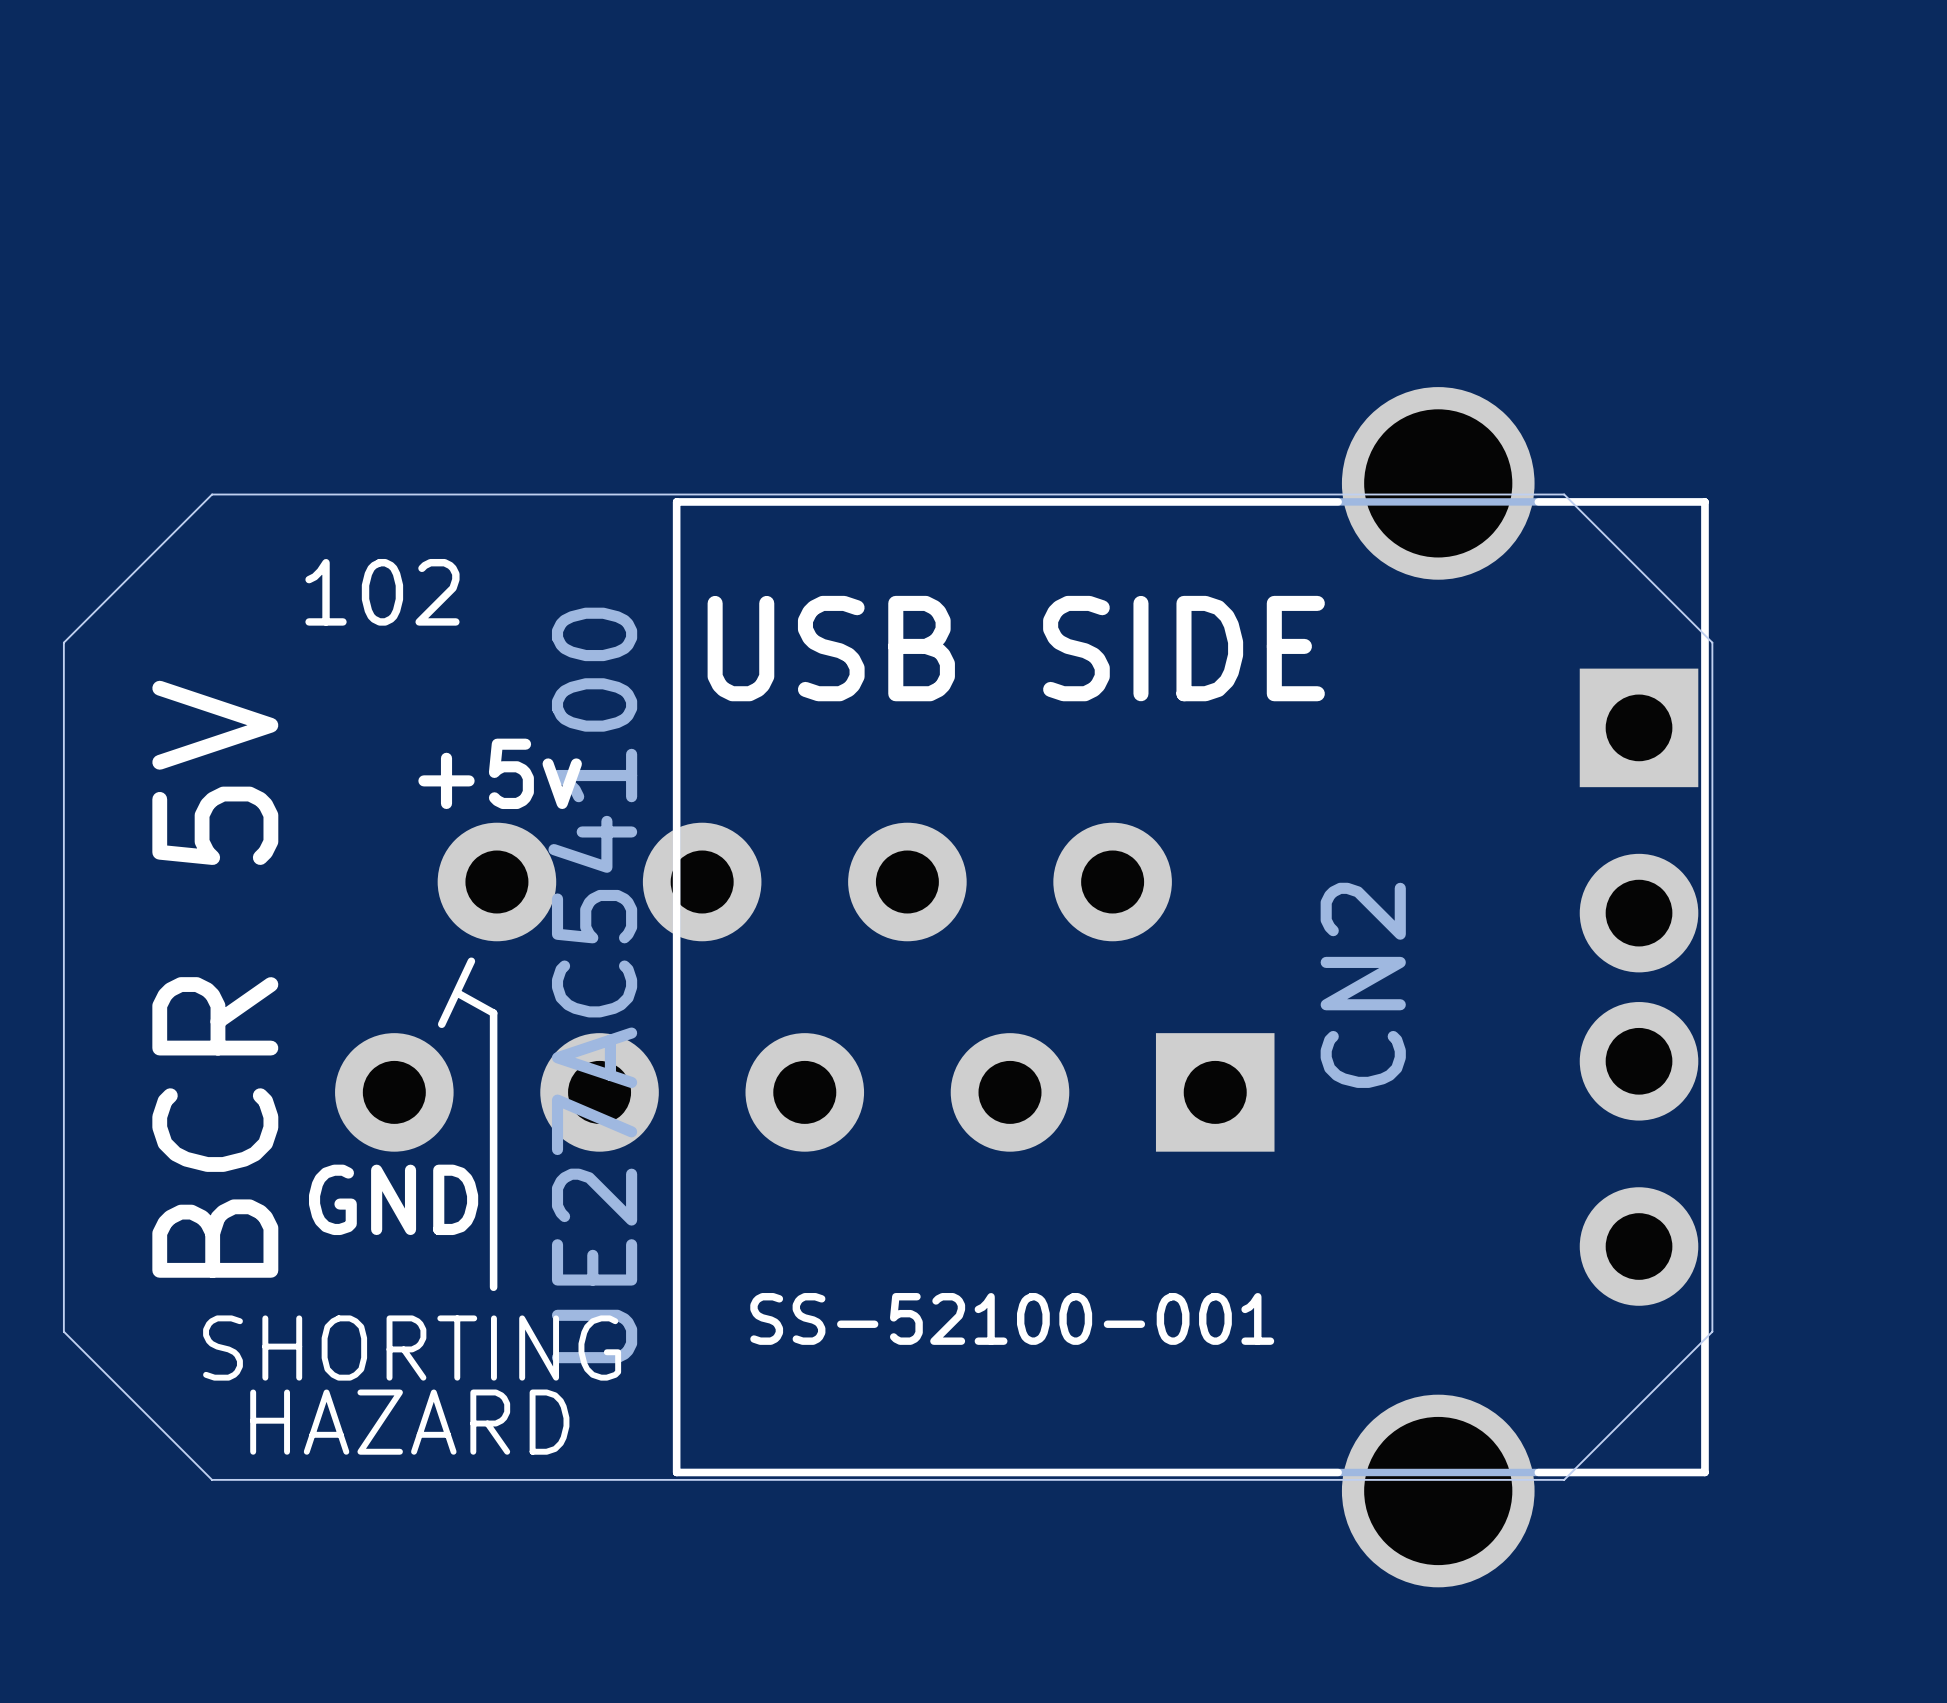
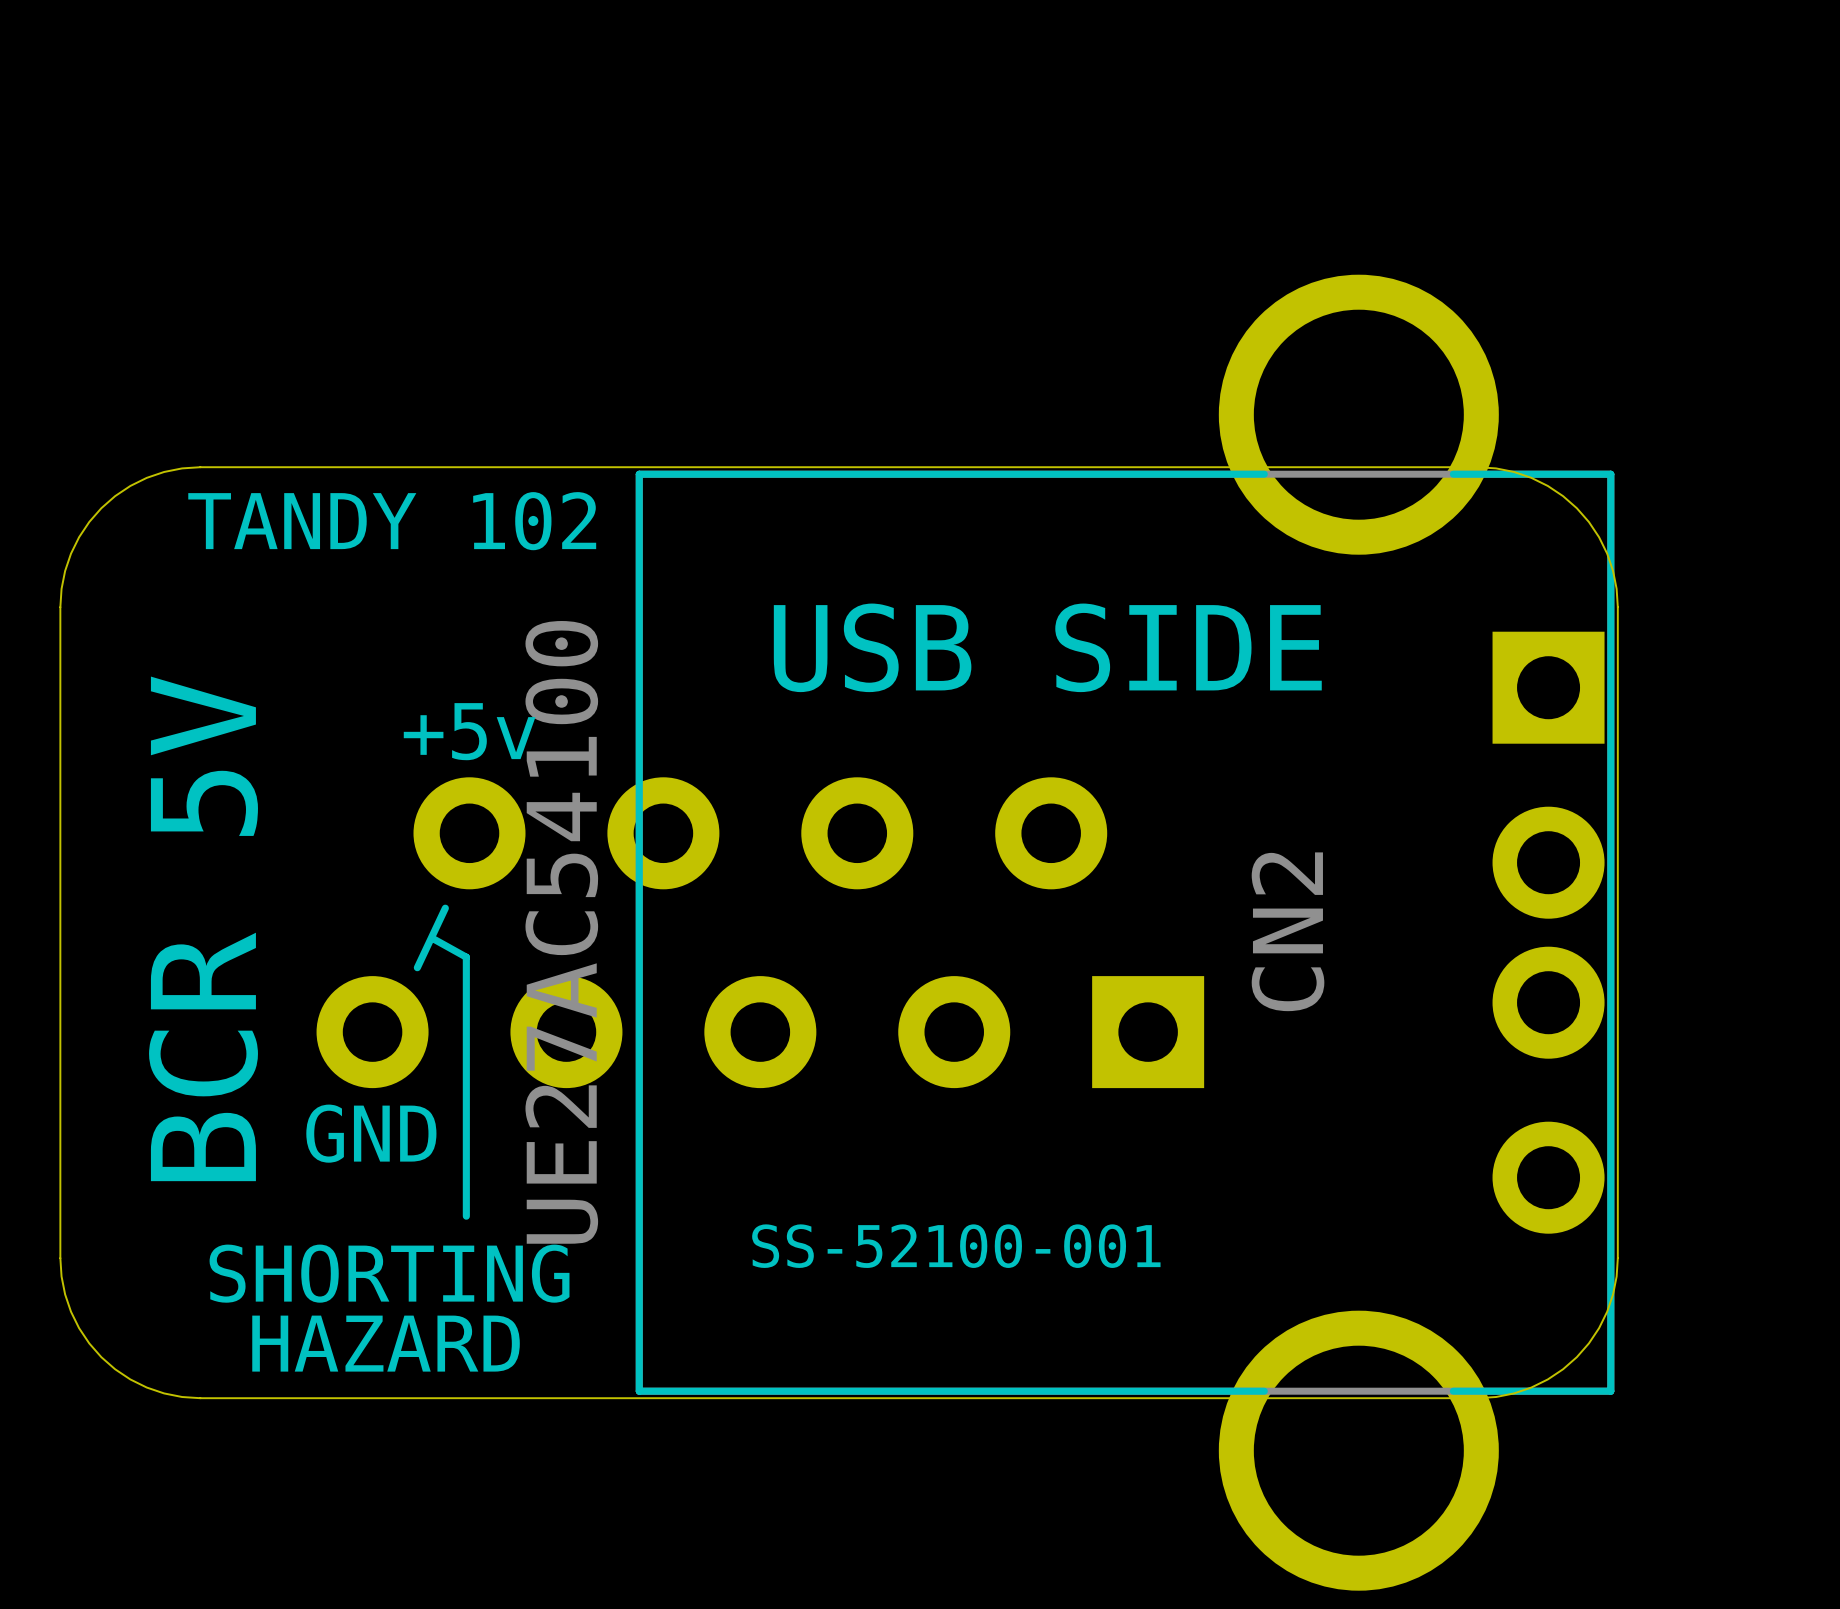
CN2 footprint: [672, 387, 1709, 1588] -> [635, 274, 1615, 1591]
board edge: (212, 494) (63, 642) -> (200, 467) (164, 471) (146, 477) (130, 485) (101, 508) (79, 537) (71, 553) (65, 570) (60, 607)
board edge: (1564, 494) (1712, 642) -> (1477, 467) (1514, 471) (1531, 477) (1547, 485) (1576, 508) (1588, 521) (1607, 553) (1616, 588) (1617, 607)
text: 102 (382, 592) -> TANDY 102 (392, 521)
text position: USB SIDE (1016, 648) -> USB SIDE (1047, 647)
board edge: (63, 1331) (212, 1479) -> (60, 1258) (65, 1294) (71, 1311) (79, 1328) (101, 1357) (130, 1379) (146, 1387) (164, 1393) (200, 1398)
board edge: (1712, 1331) (1564, 1479) -> (1617, 1258) (1616, 1276) (1607, 1311) (1588, 1343) (1576, 1357) (1547, 1379) (1531, 1387) (1514, 1393) (1477, 1398)

